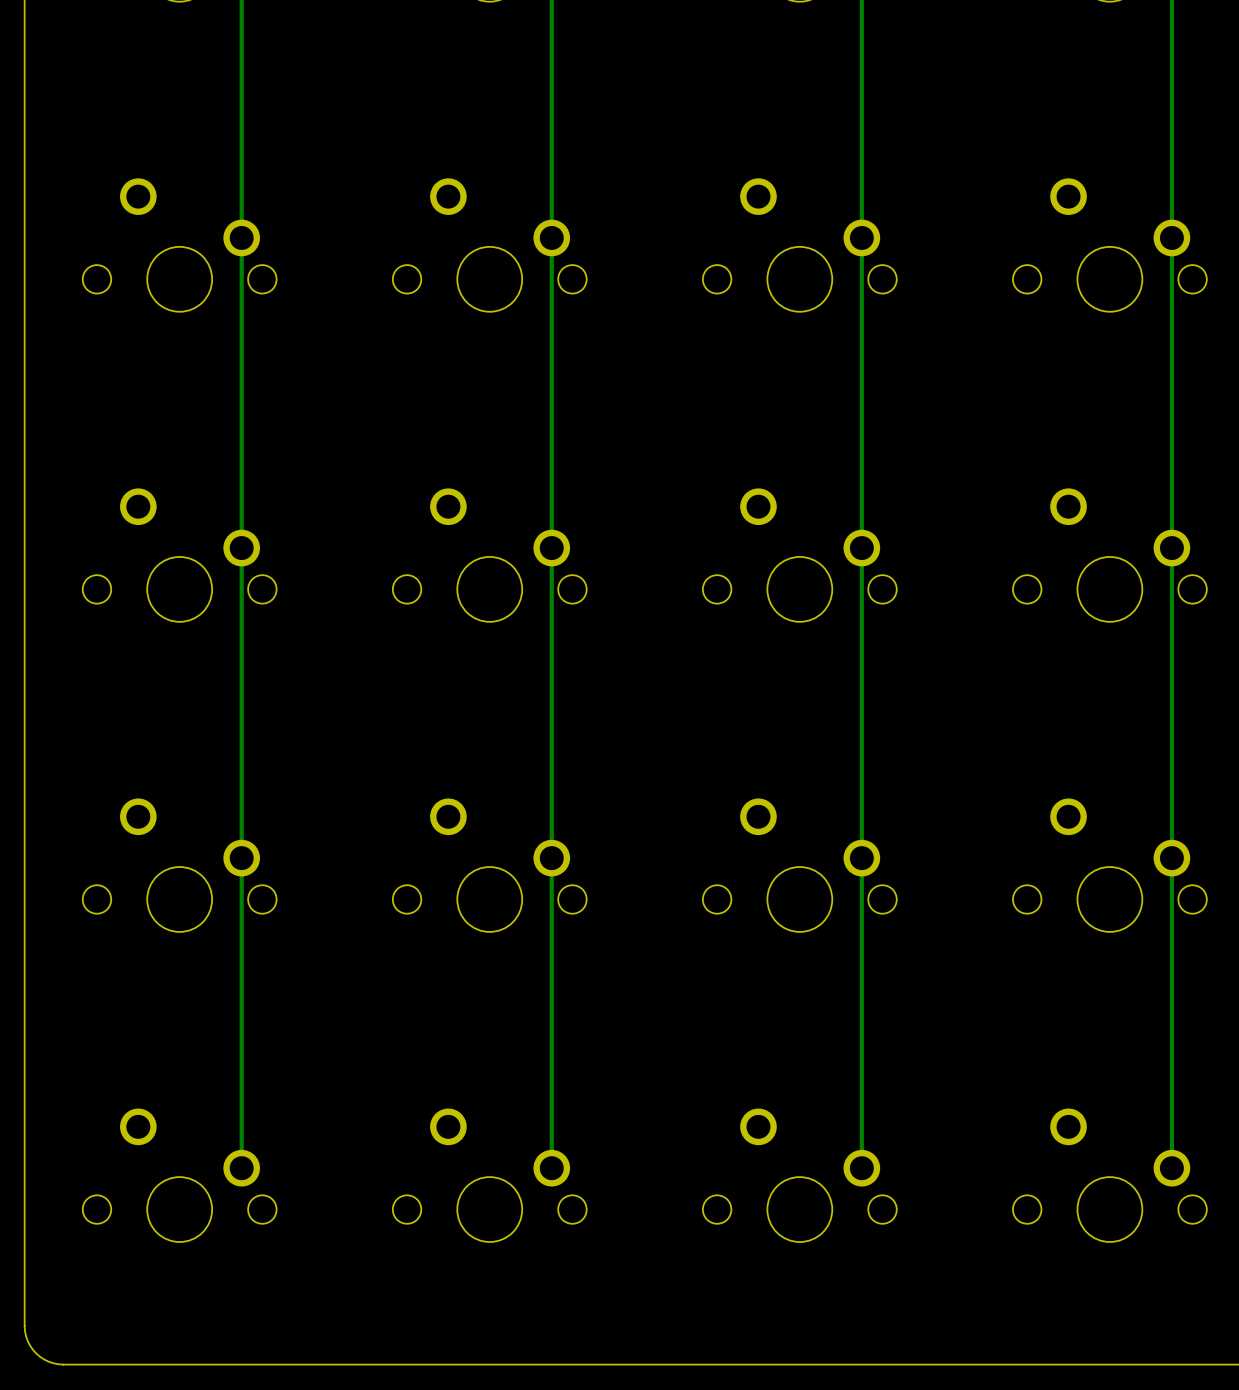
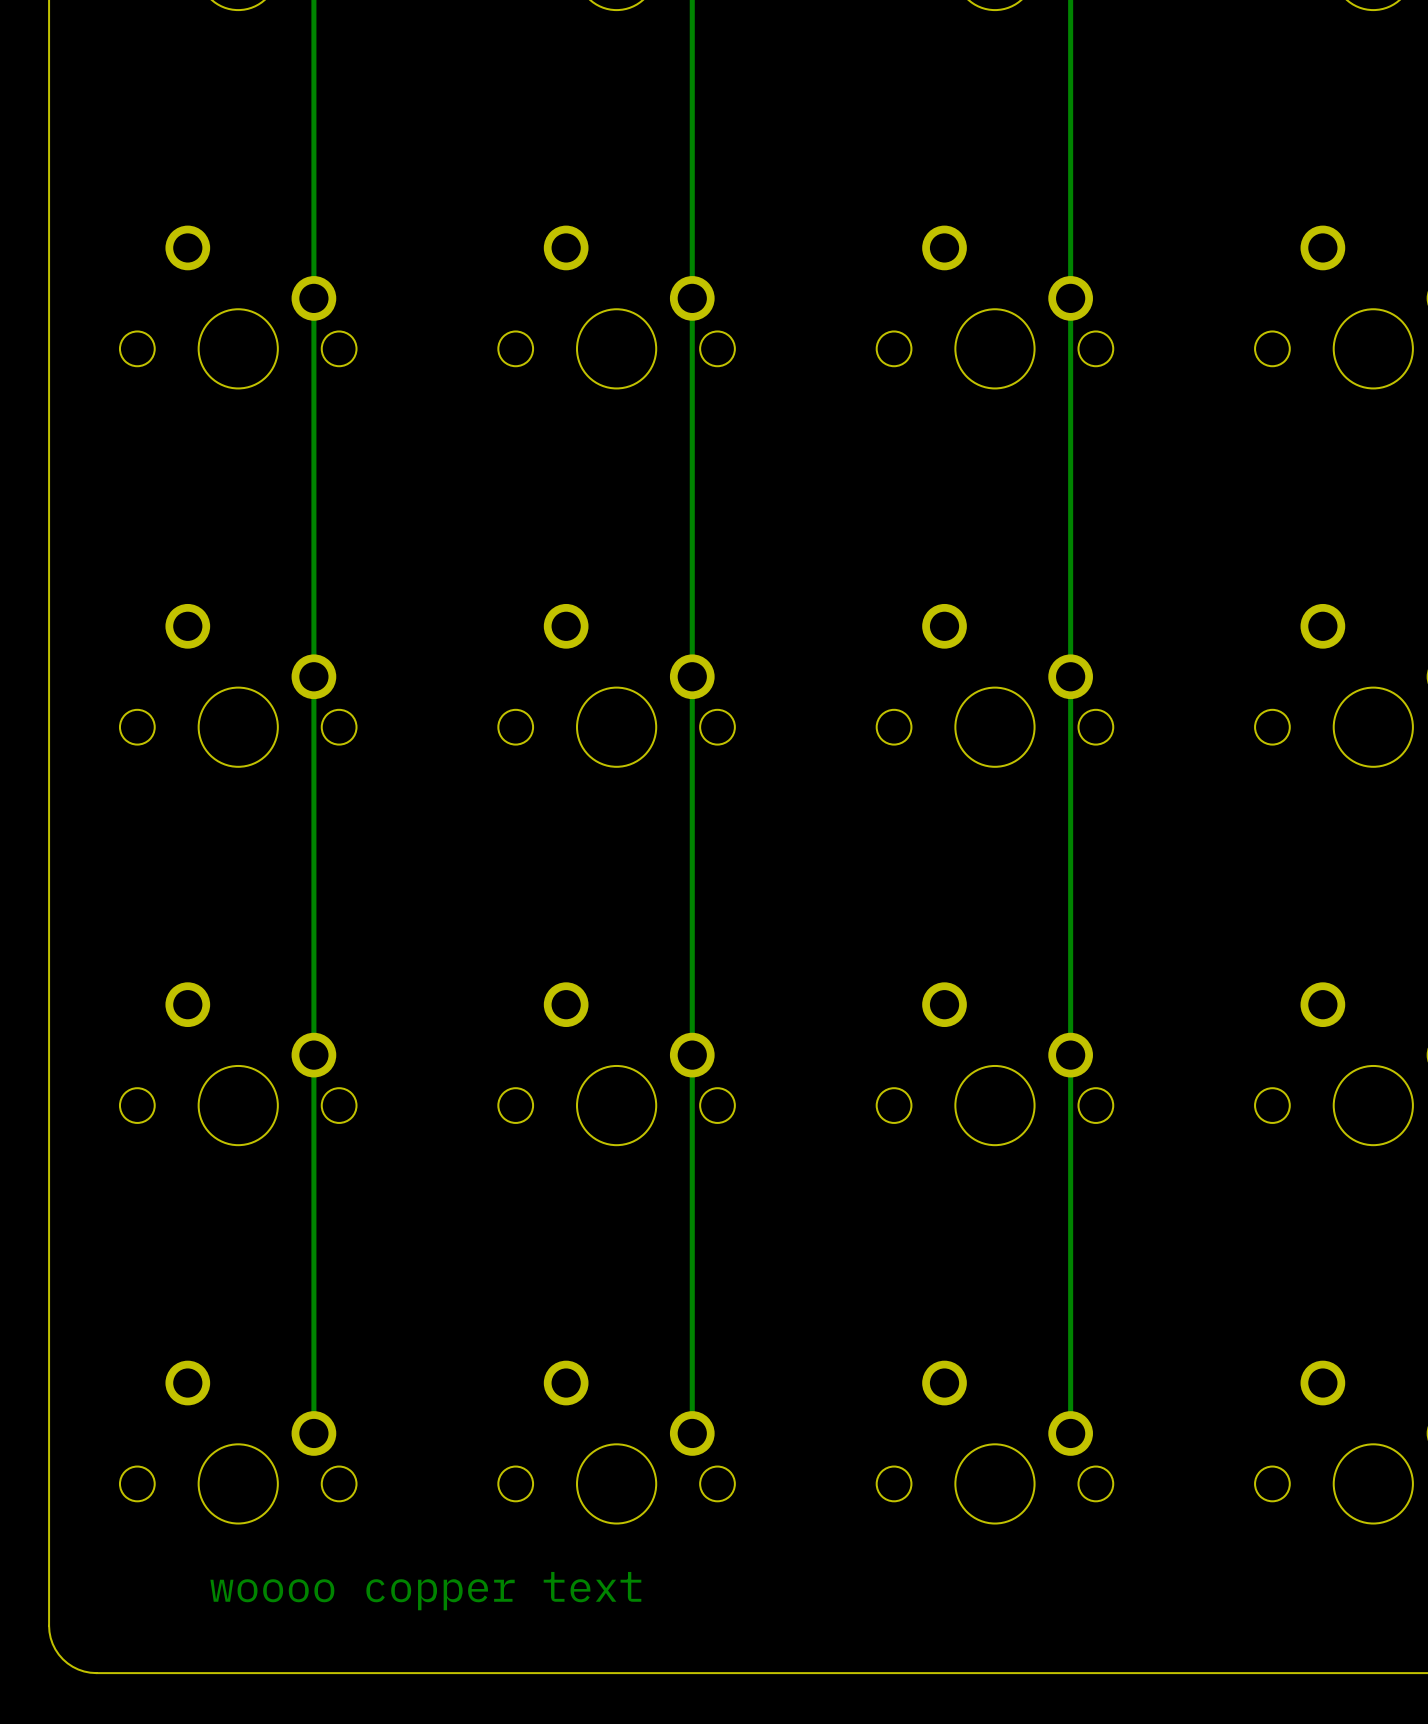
text: none -> woooo copper text (425, 1591)

